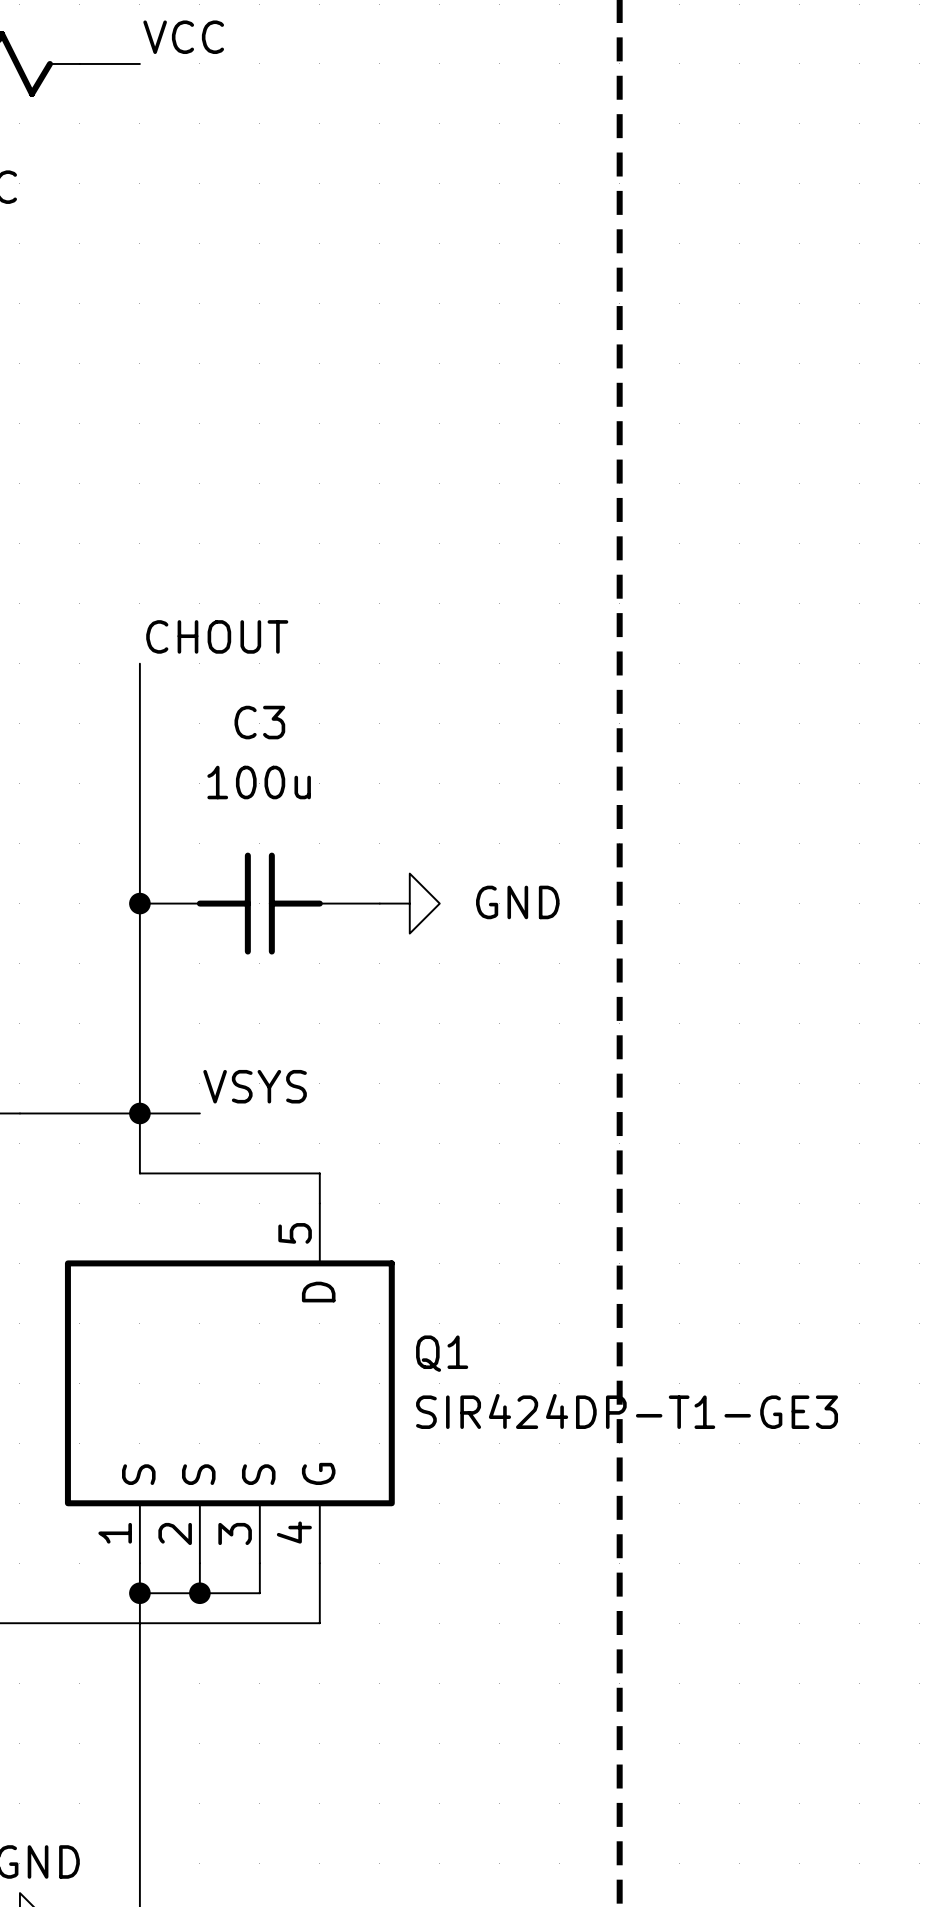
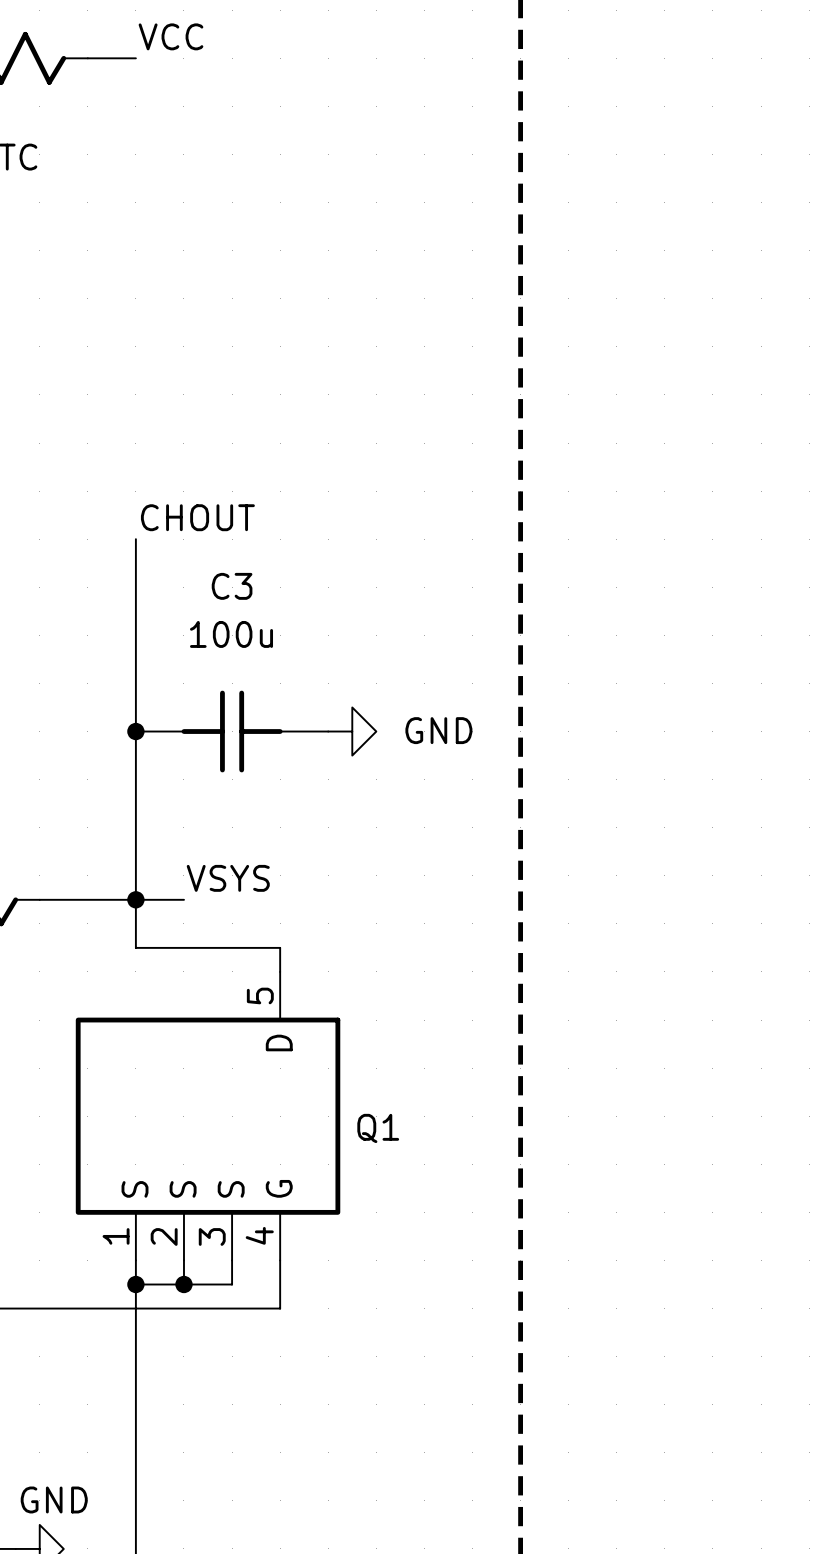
Q1 name position: Q1 (442, 1353) -> Q1 (378, 1128)
Q1 value: SIR424DP-T1-GE3 (627, 1411) -> none

